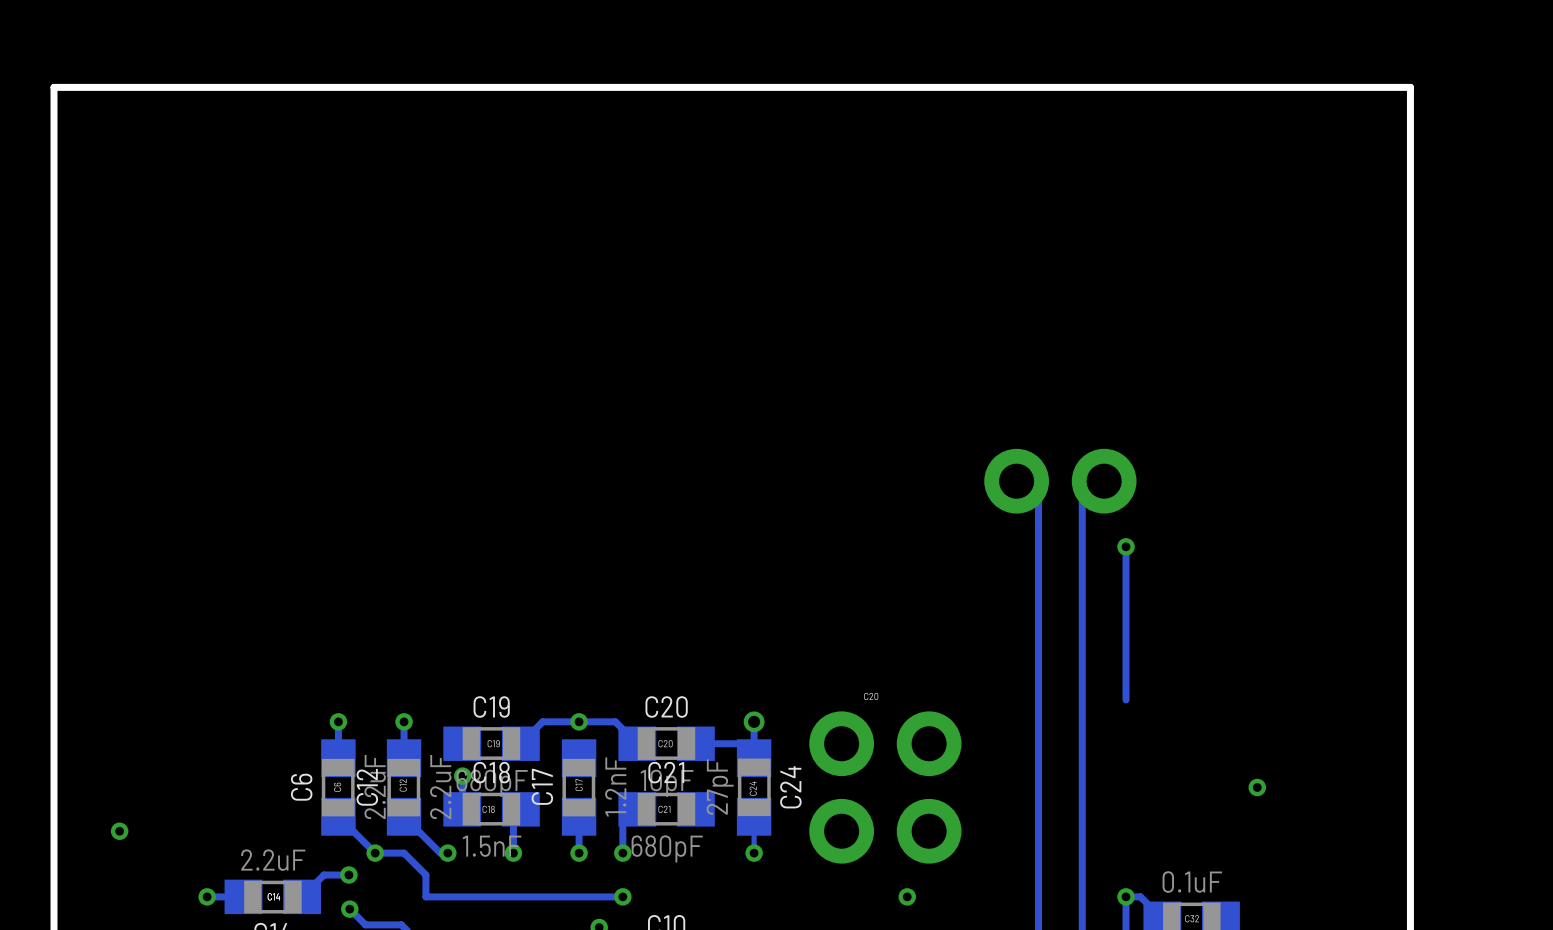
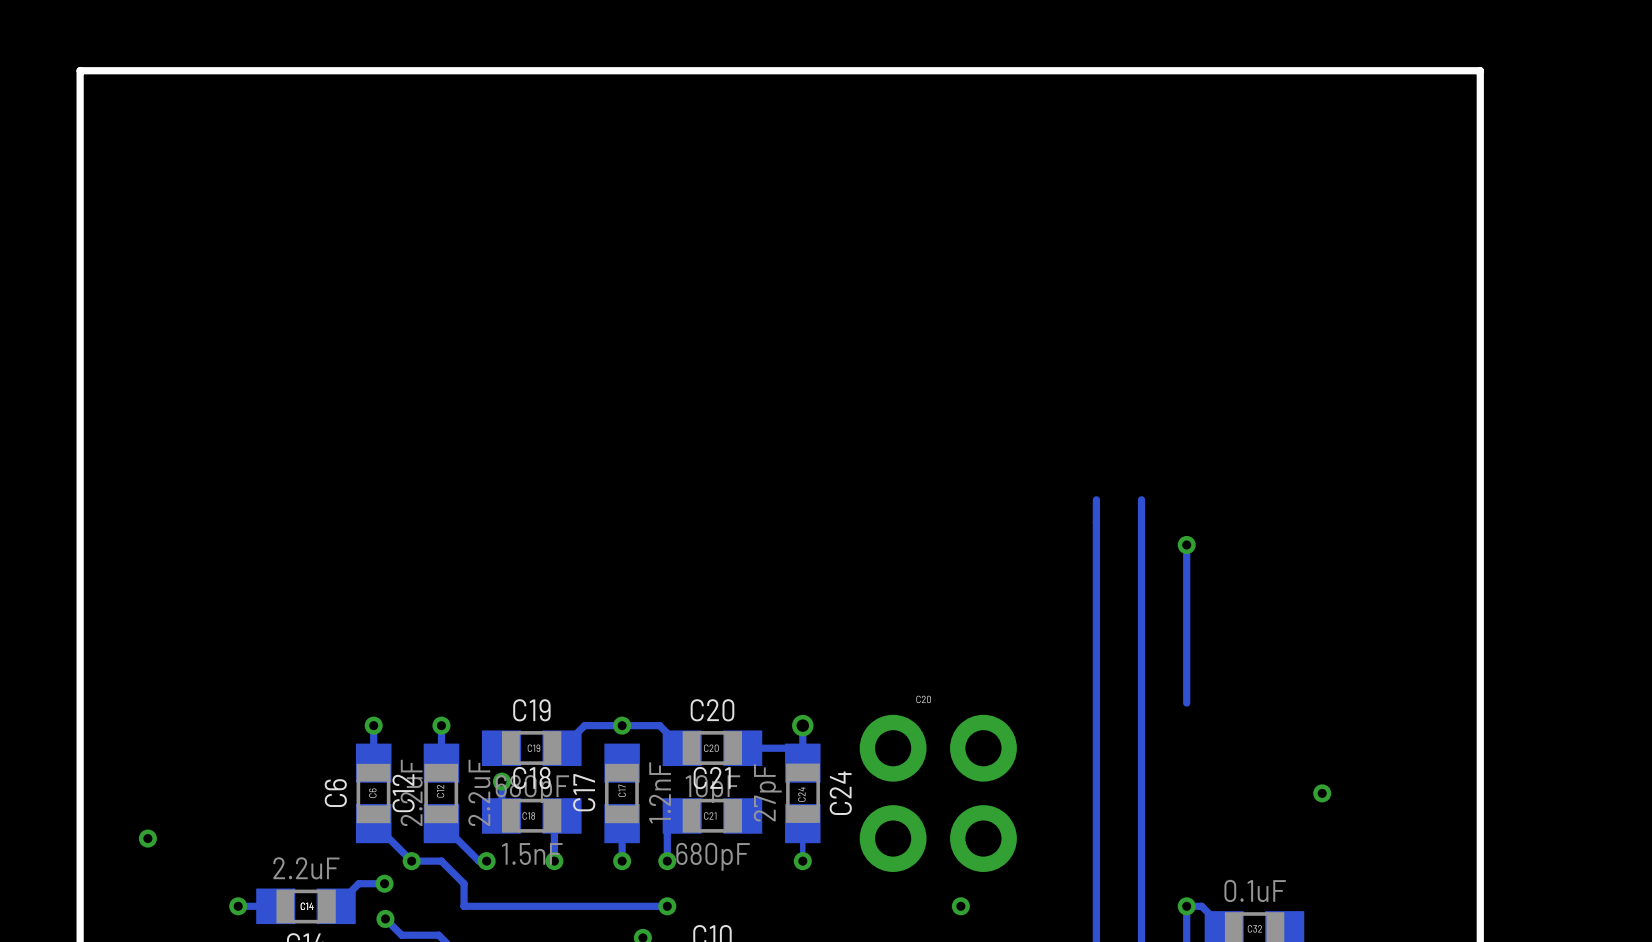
part: (1060, 481) -> none

